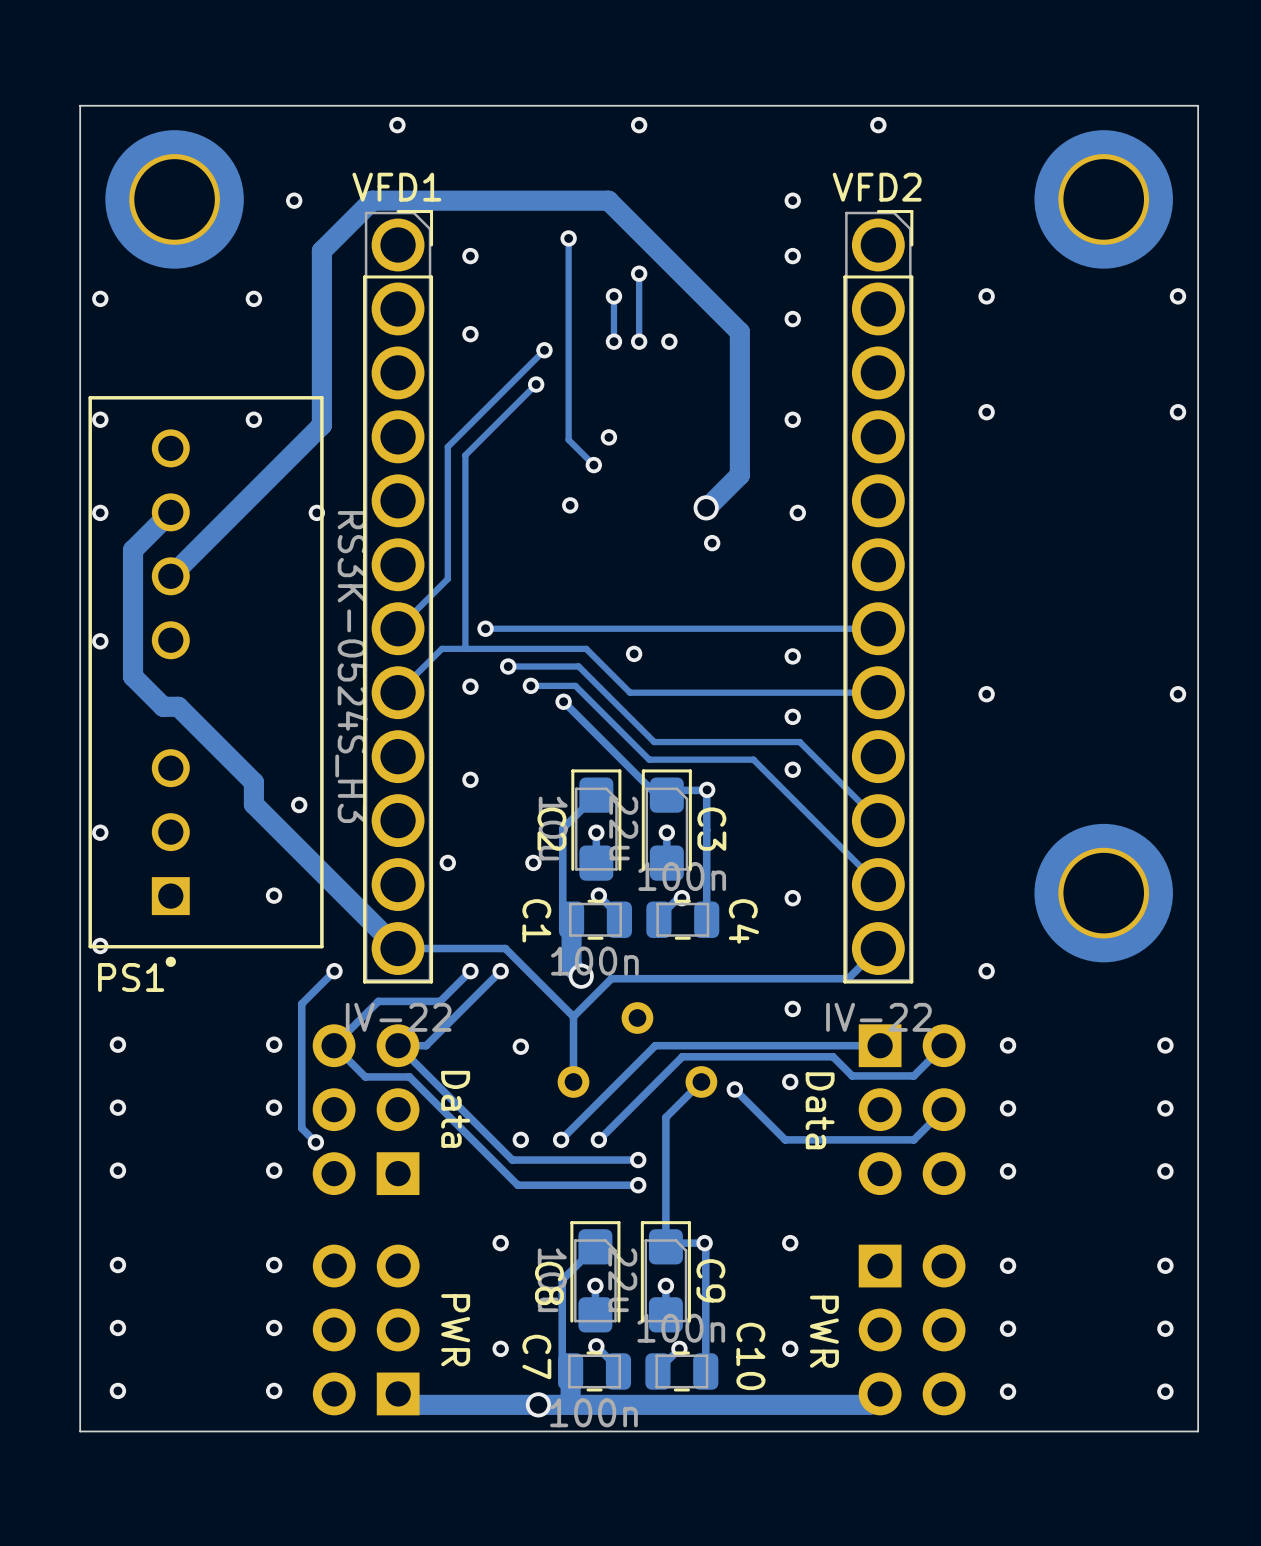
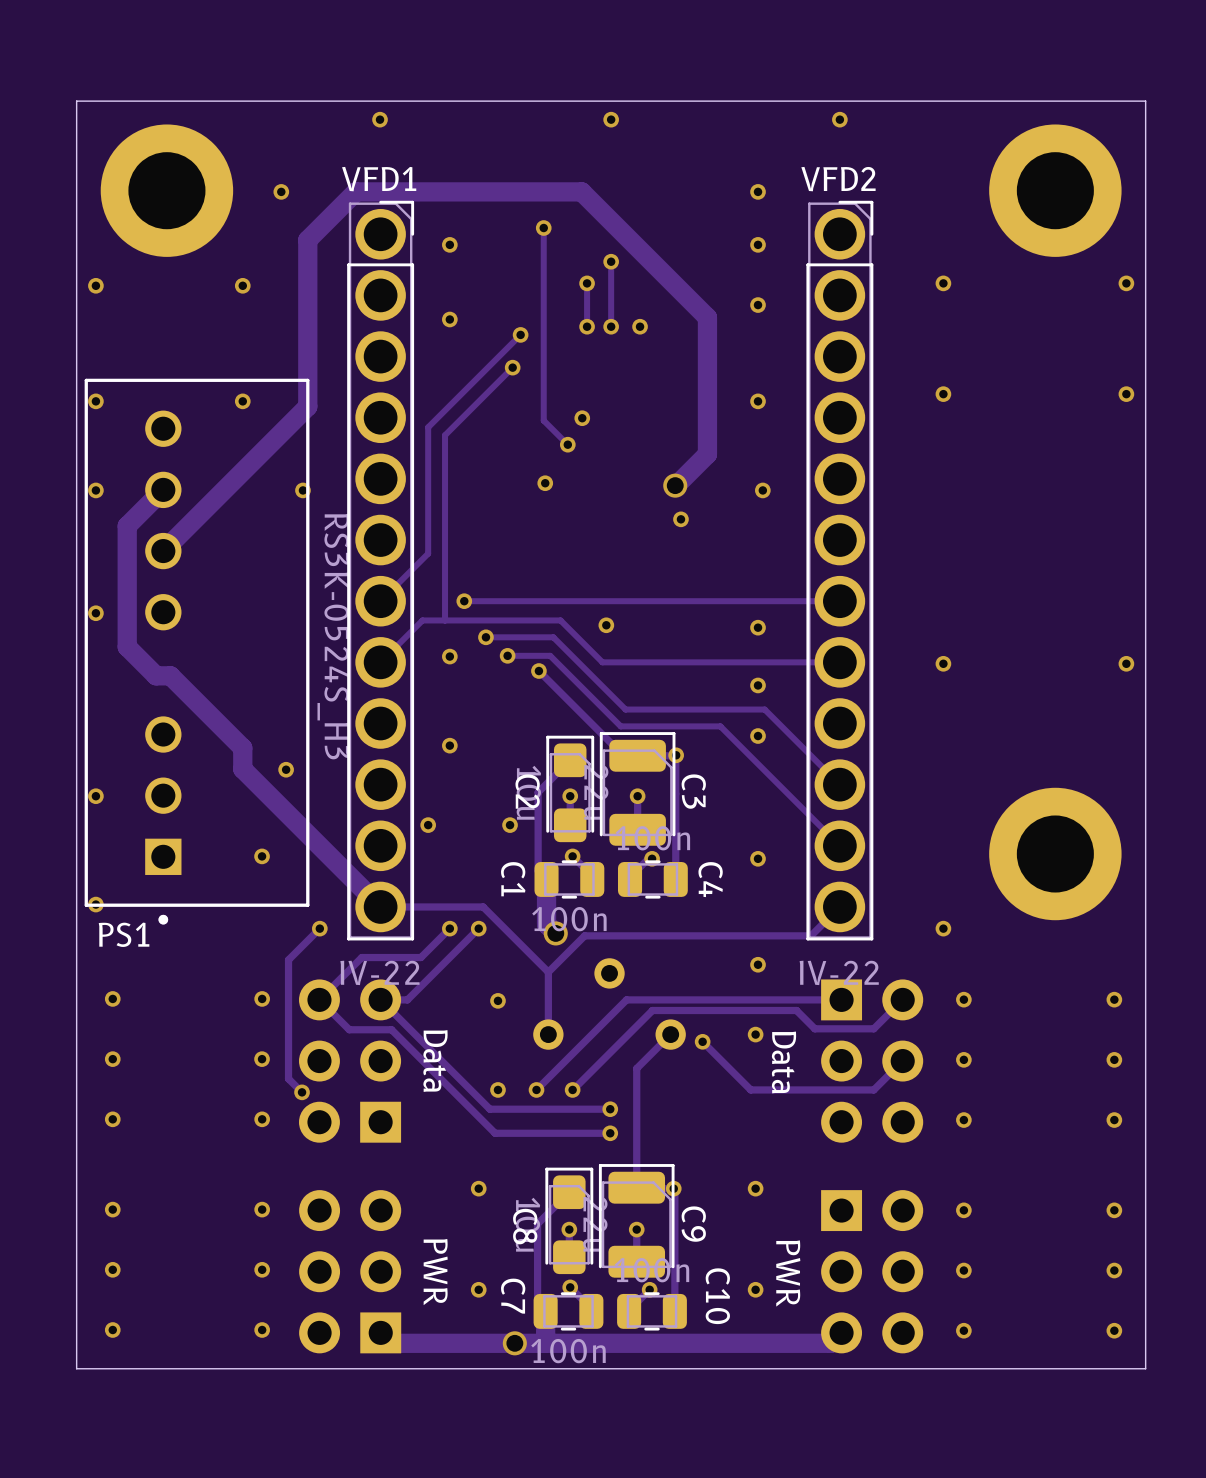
C3 footprint: [641, 769, 692, 881] -> [599, 732, 676, 846]
C3 name position: C3 (711, 829) -> C3 (693, 791)
C9 footprint: [640, 1221, 691, 1333] -> [598, 1164, 675, 1278]
C9 name position: C9 (710, 1280) -> C9 (693, 1224)

